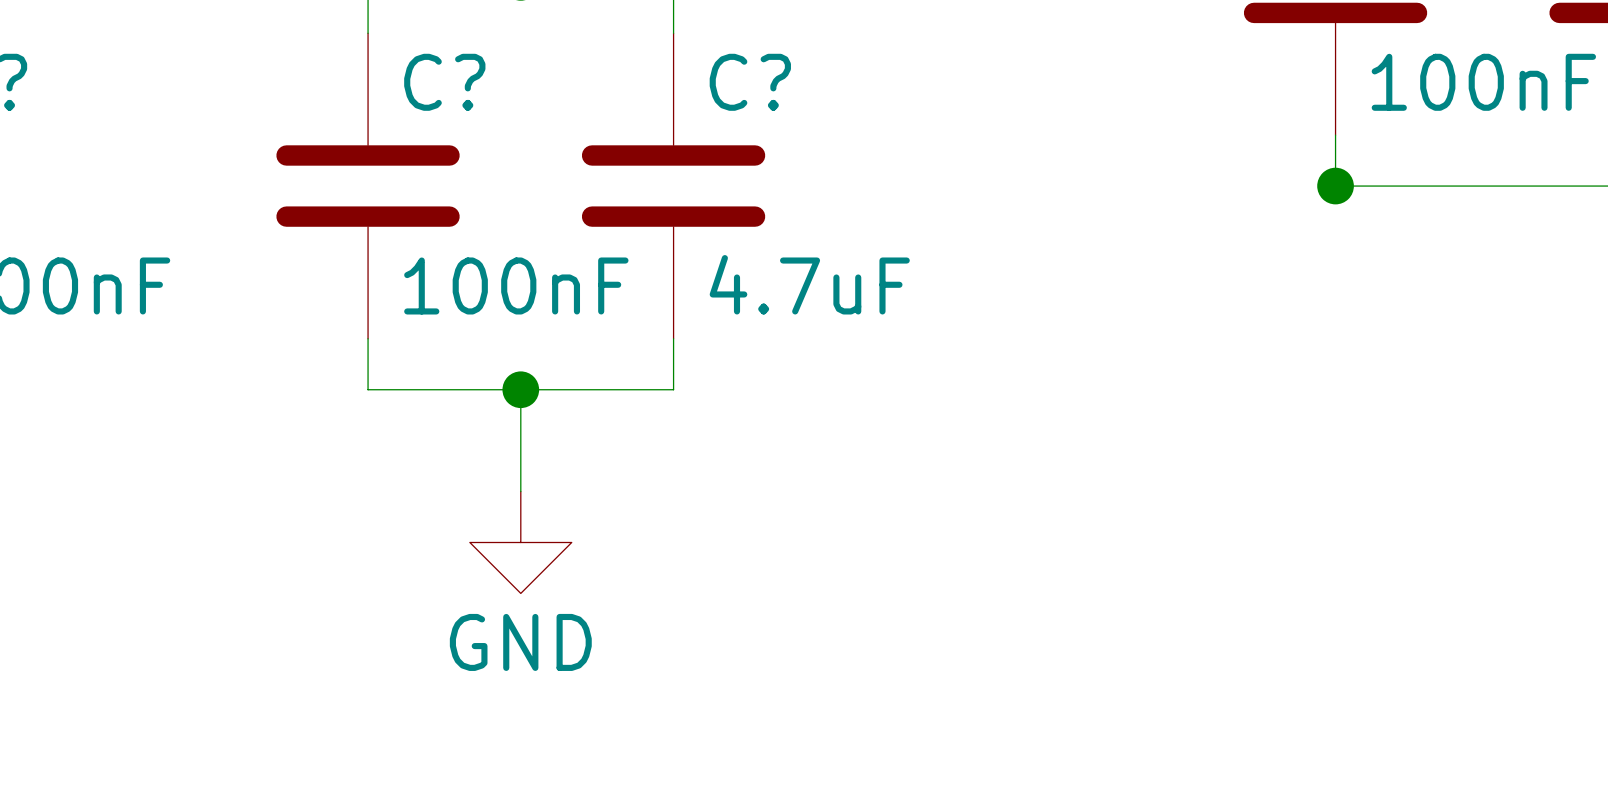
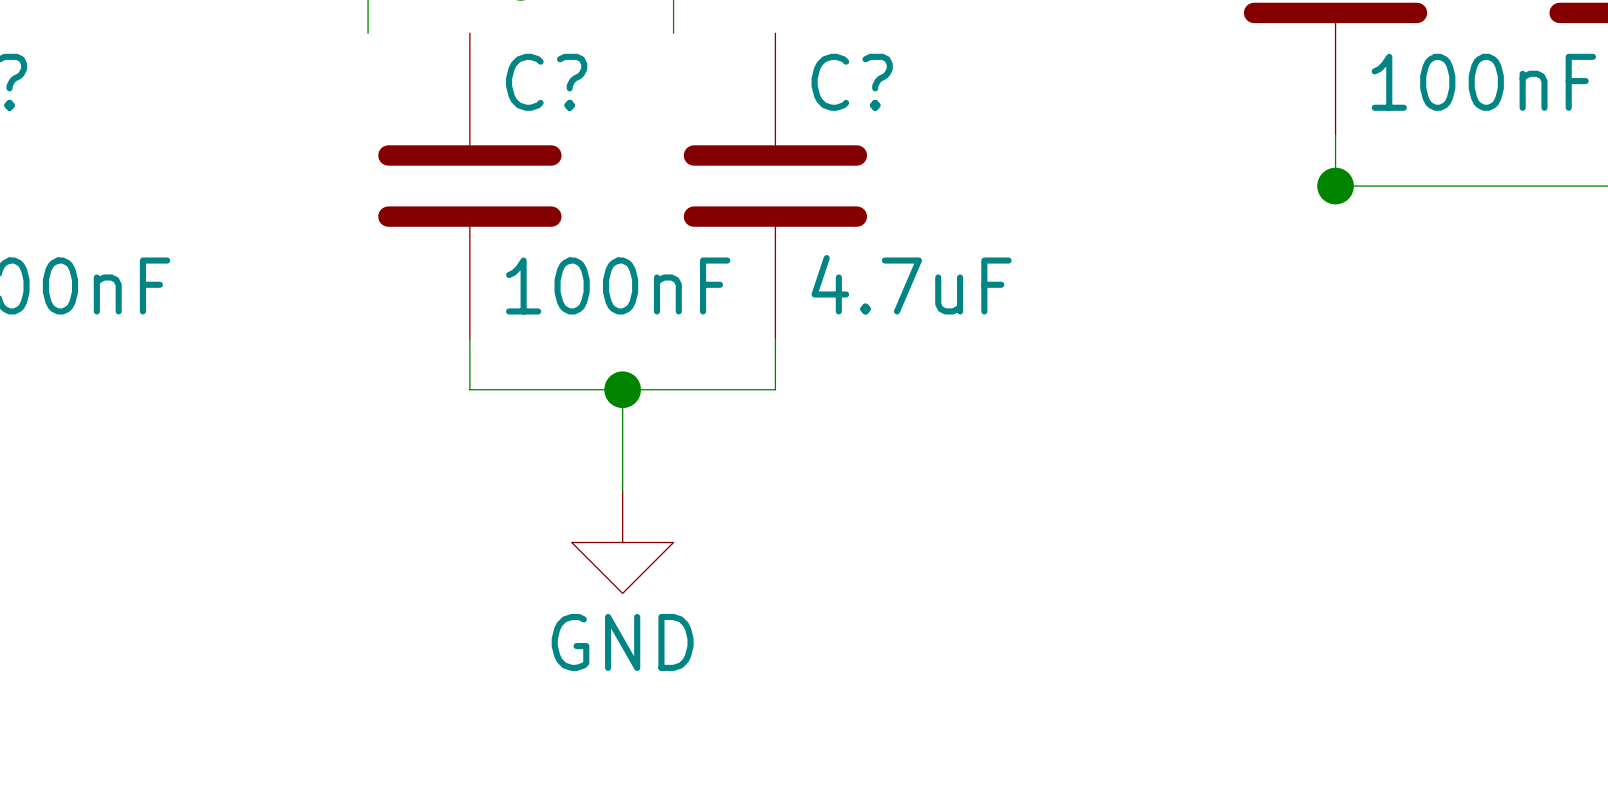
C? position: (368, 186) -> (469, 186)
C? position: (673, 186) -> (775, 186)
wire: (368, 338) (368, 389) (469, 389) -> (469, 338) (469, 389)
wire: (673, 338) (673, 389) -> (775, 338) (775, 389) (673, 389)
wire: (520, 389) (520, 491) -> (622, 389) (622, 491)
junction position: (520, 389) -> (622, 389)
power symbol position: GND (520, 542) -> GND (622, 542)

